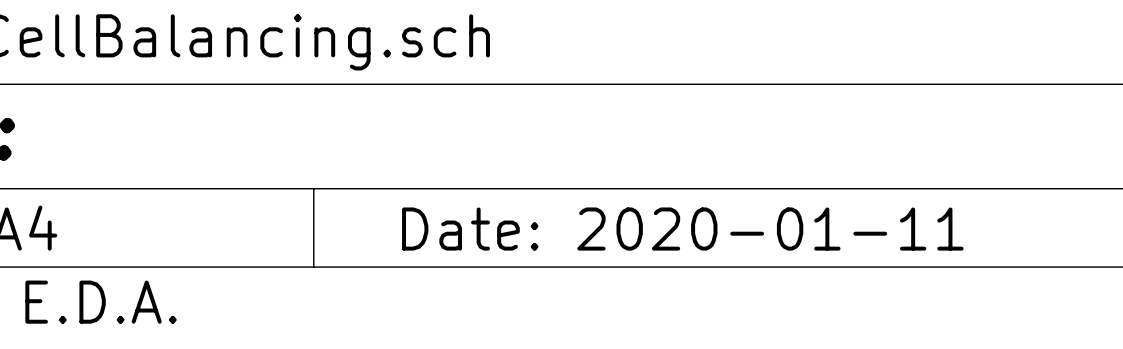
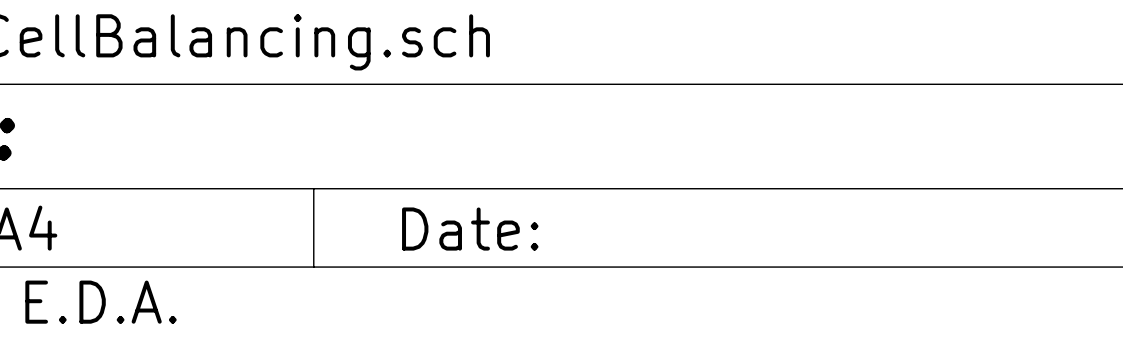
title block: Date: 2020-01-11 (682, 229) -> Date: (470, 229)

